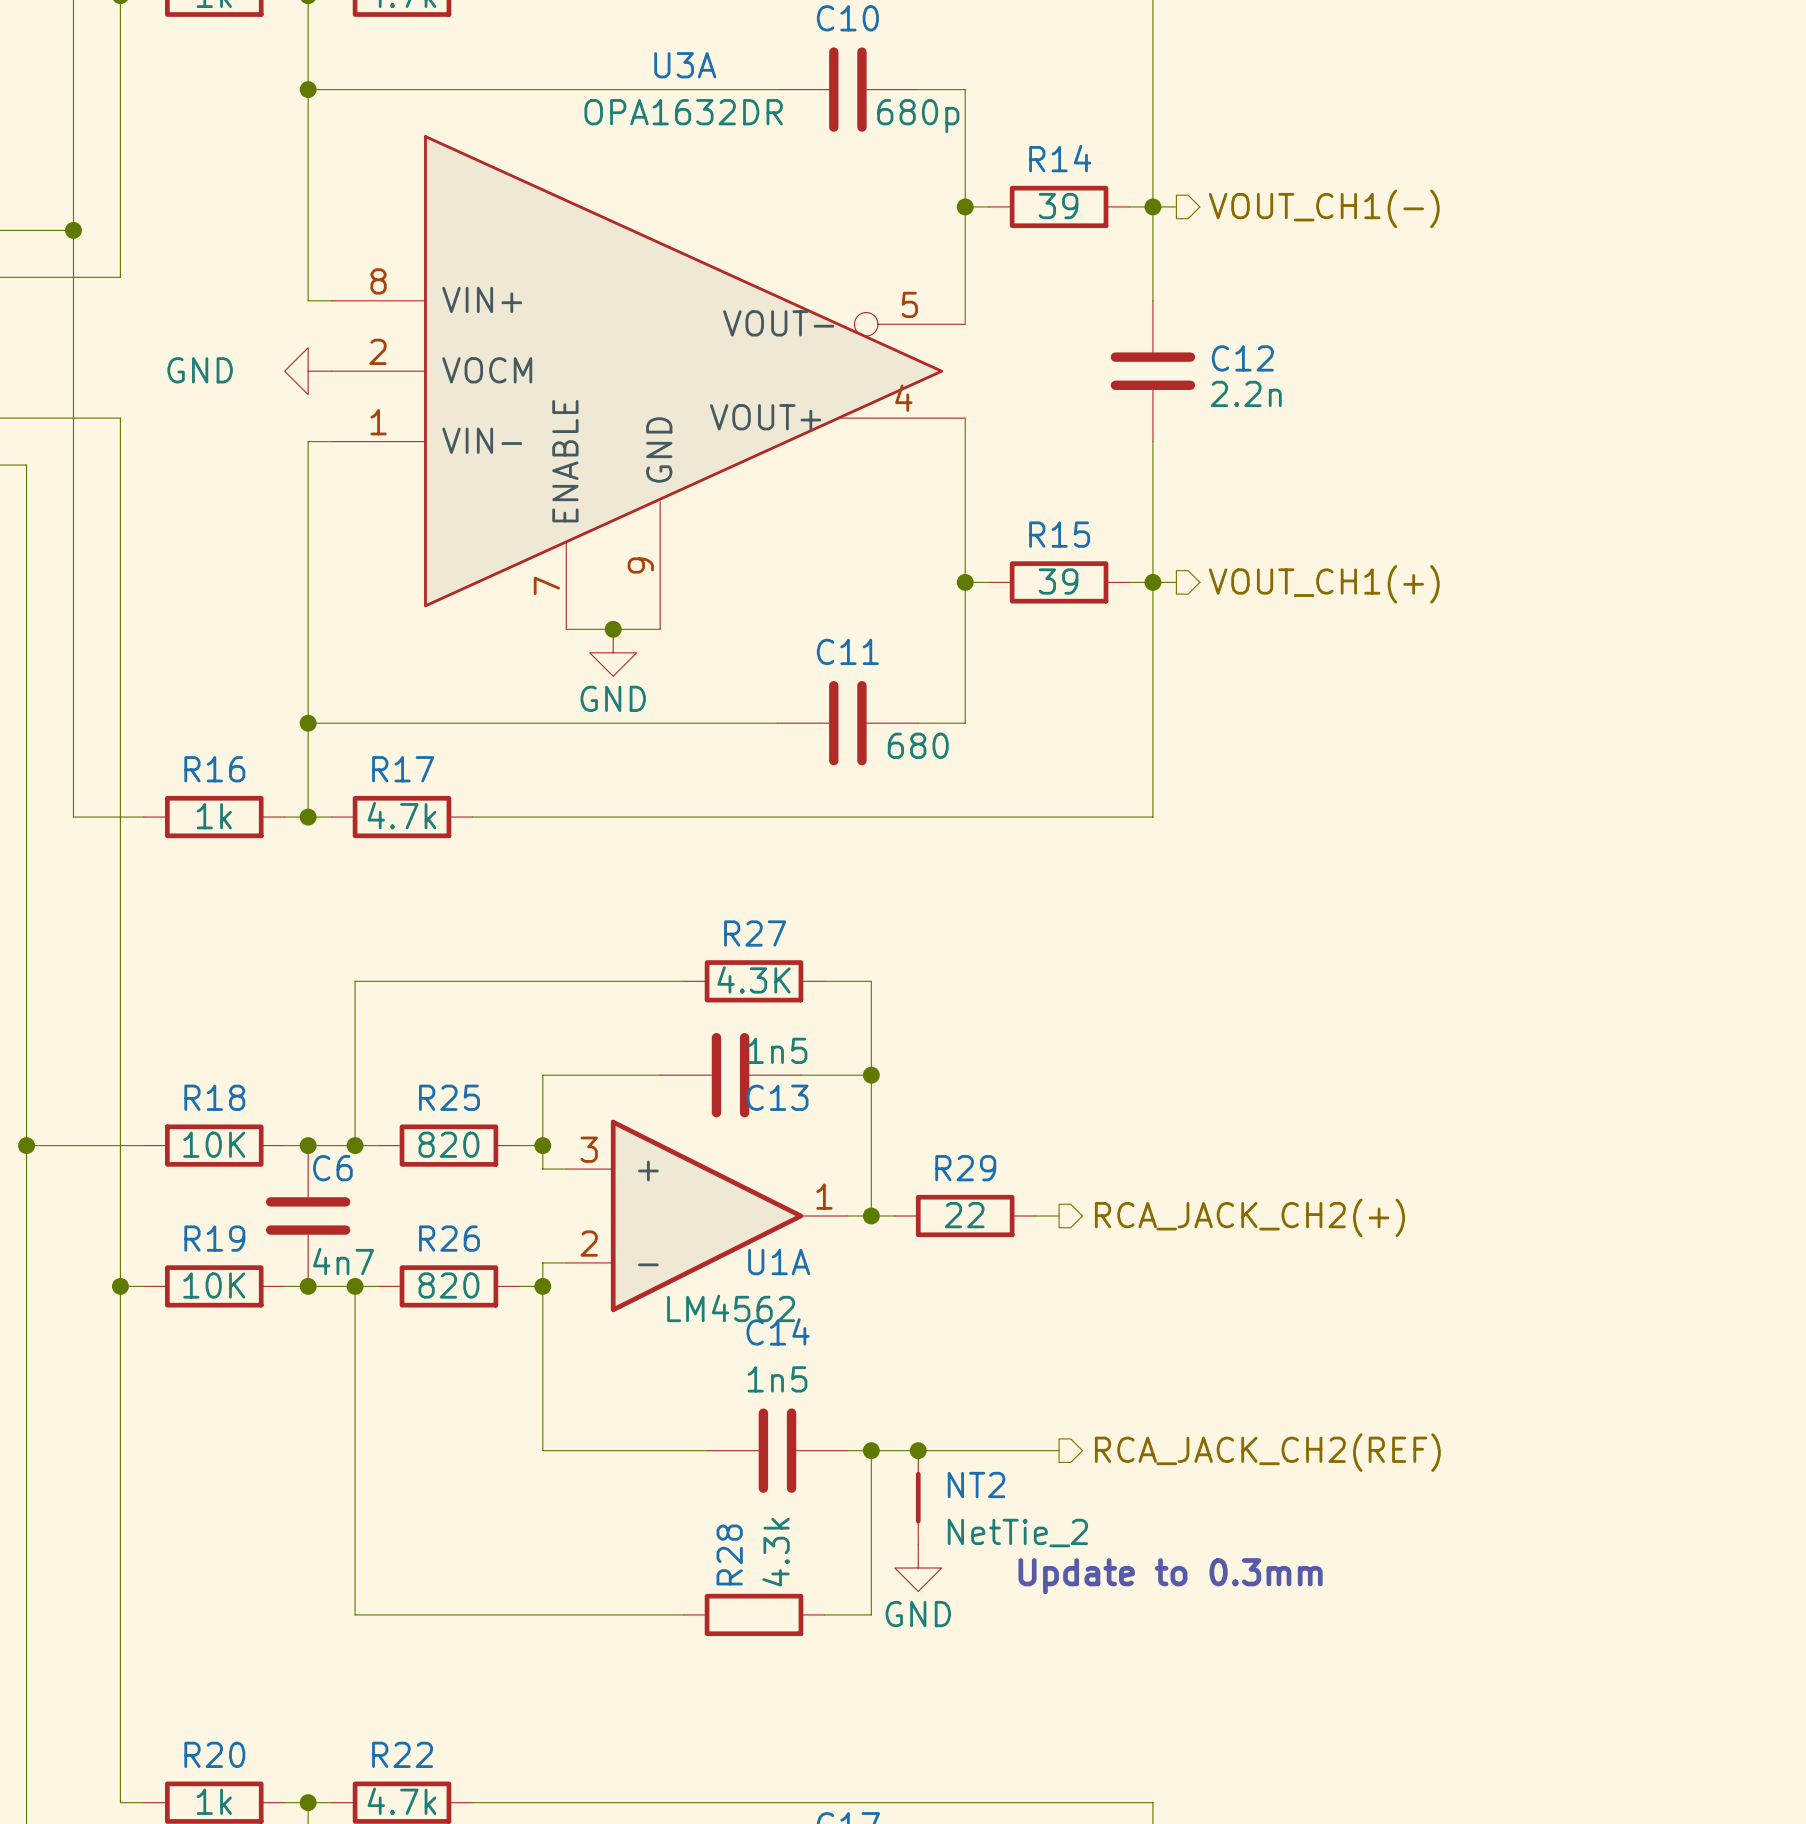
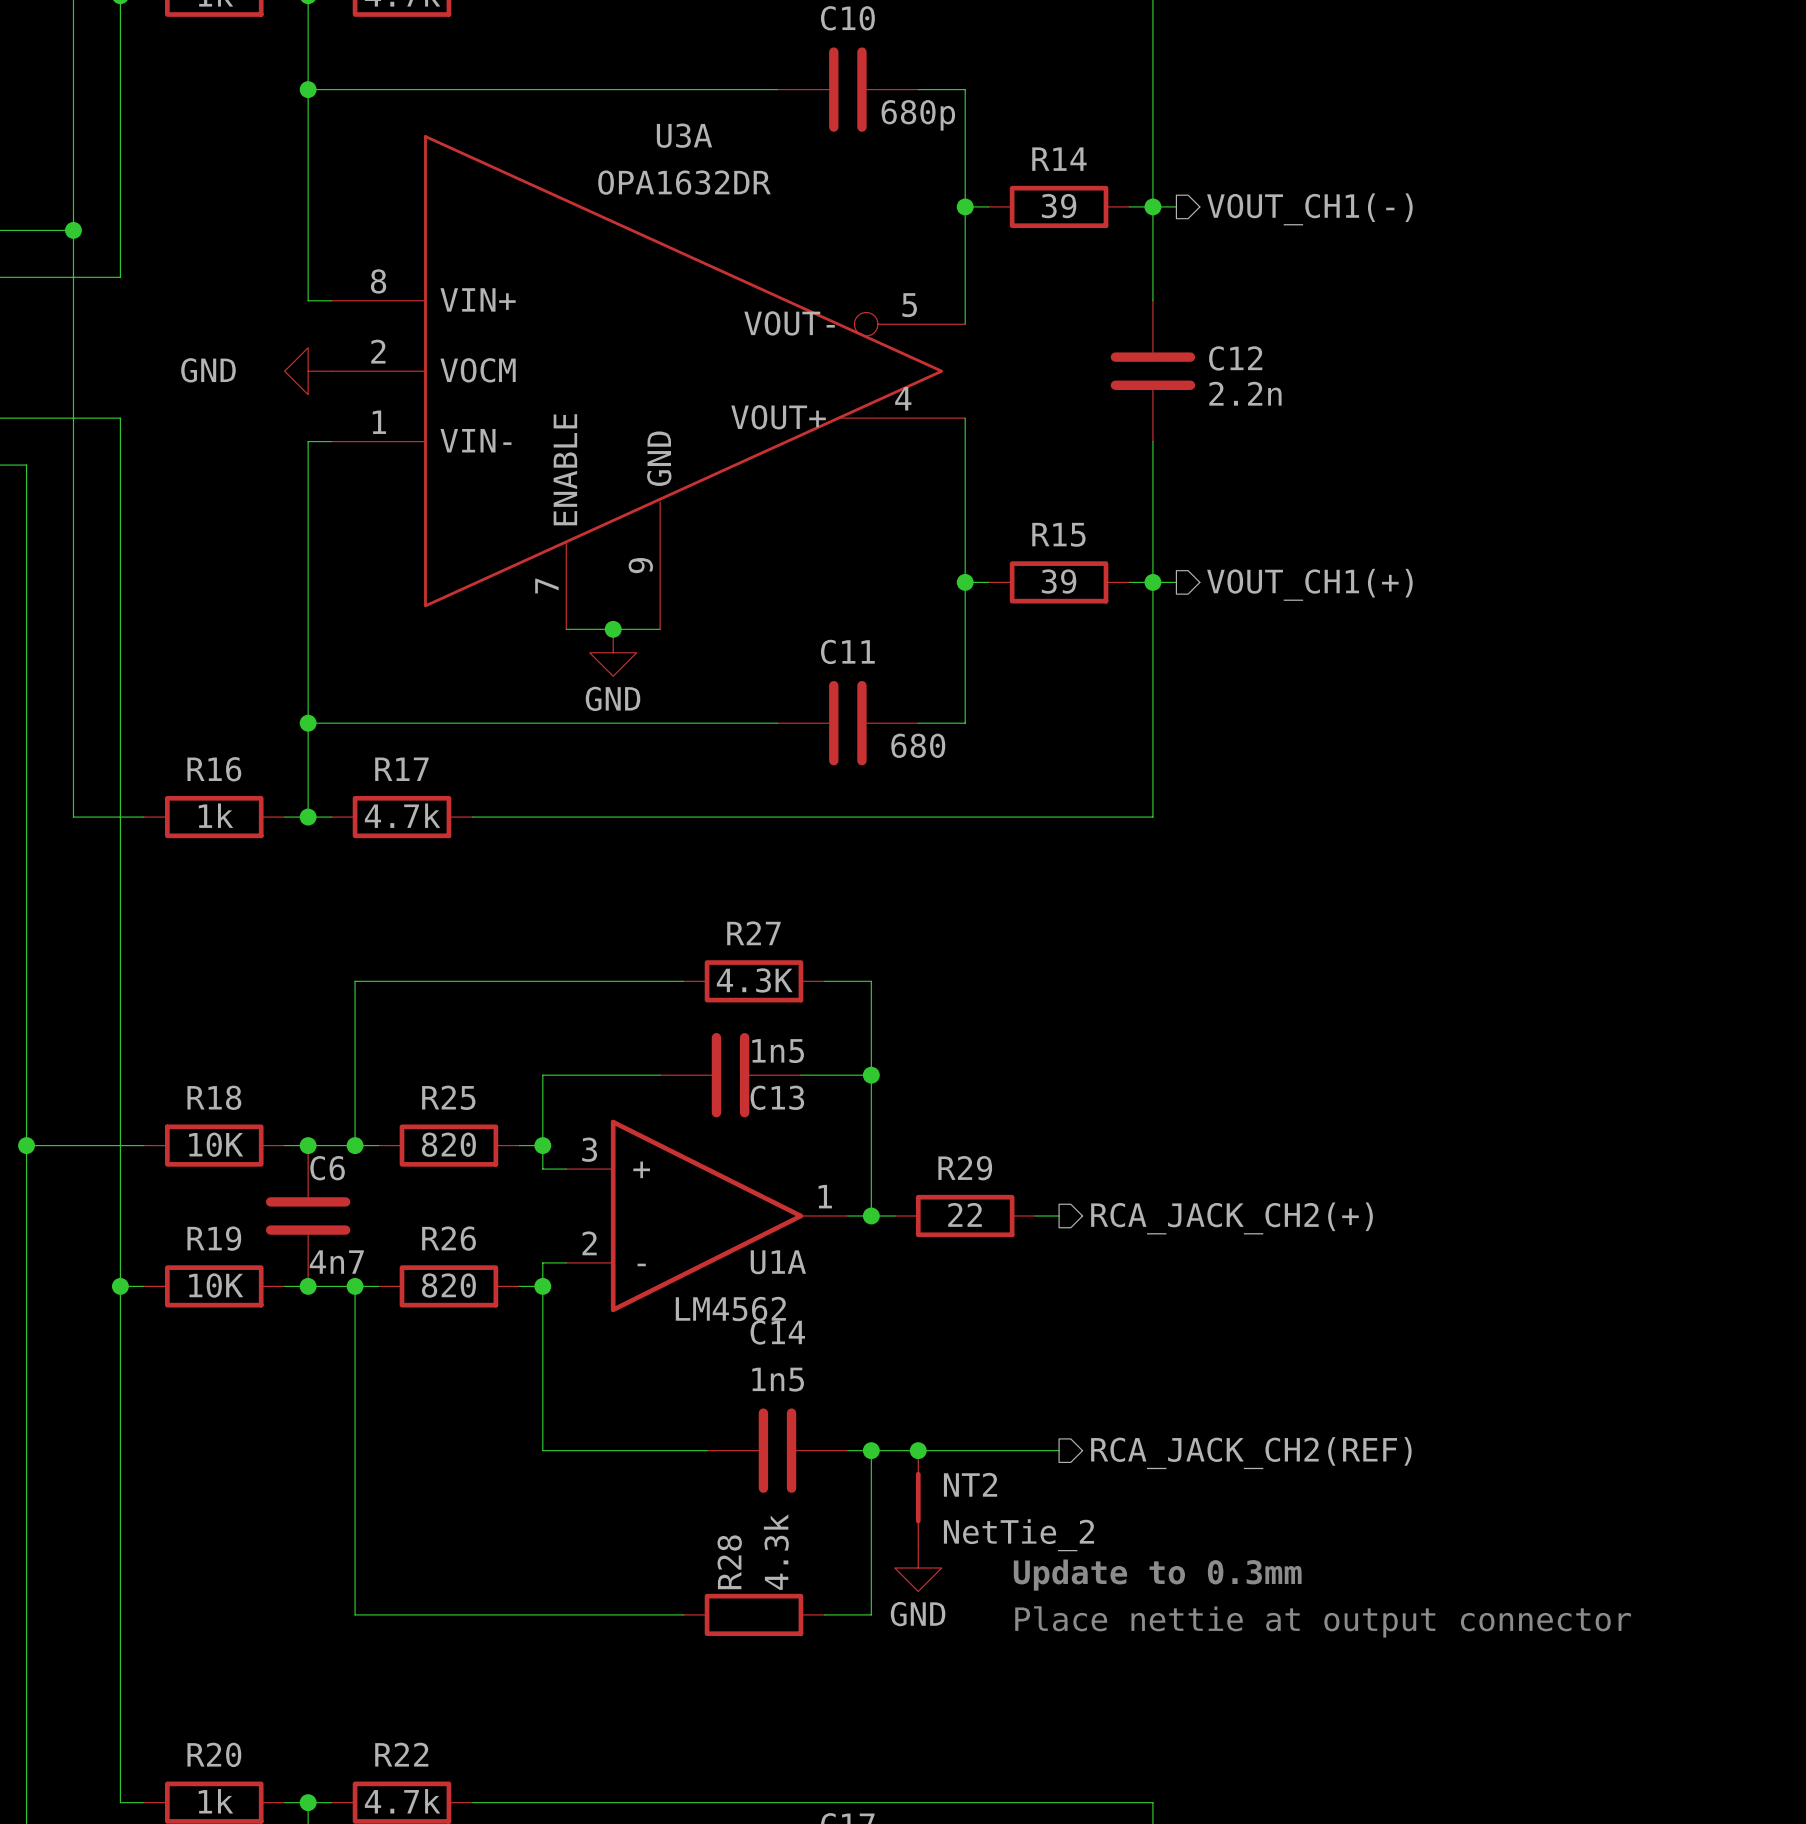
U3A name position: U3A (685, 65) -> U3A (684, 135)
U3A value position: OPA1632DR (683, 112) -> OPA1632DR (684, 182)
text: none -> Place nettie at output connector (1323, 1621)

